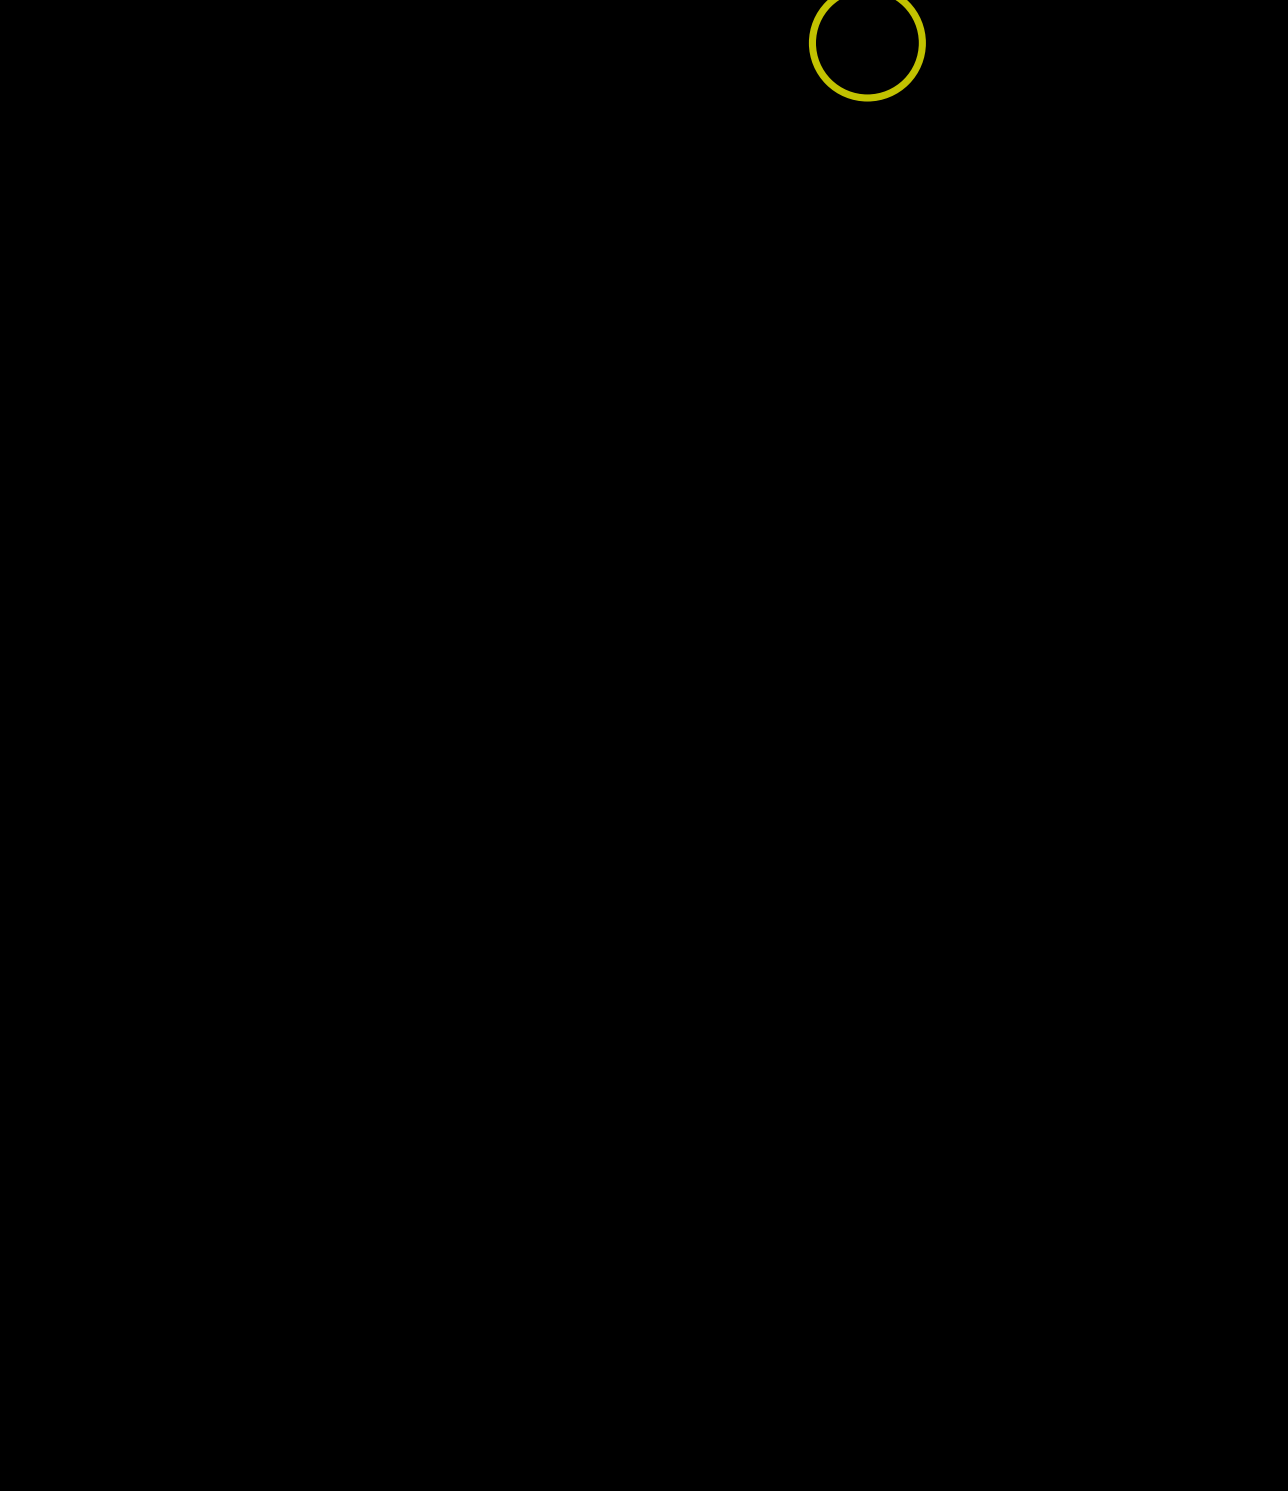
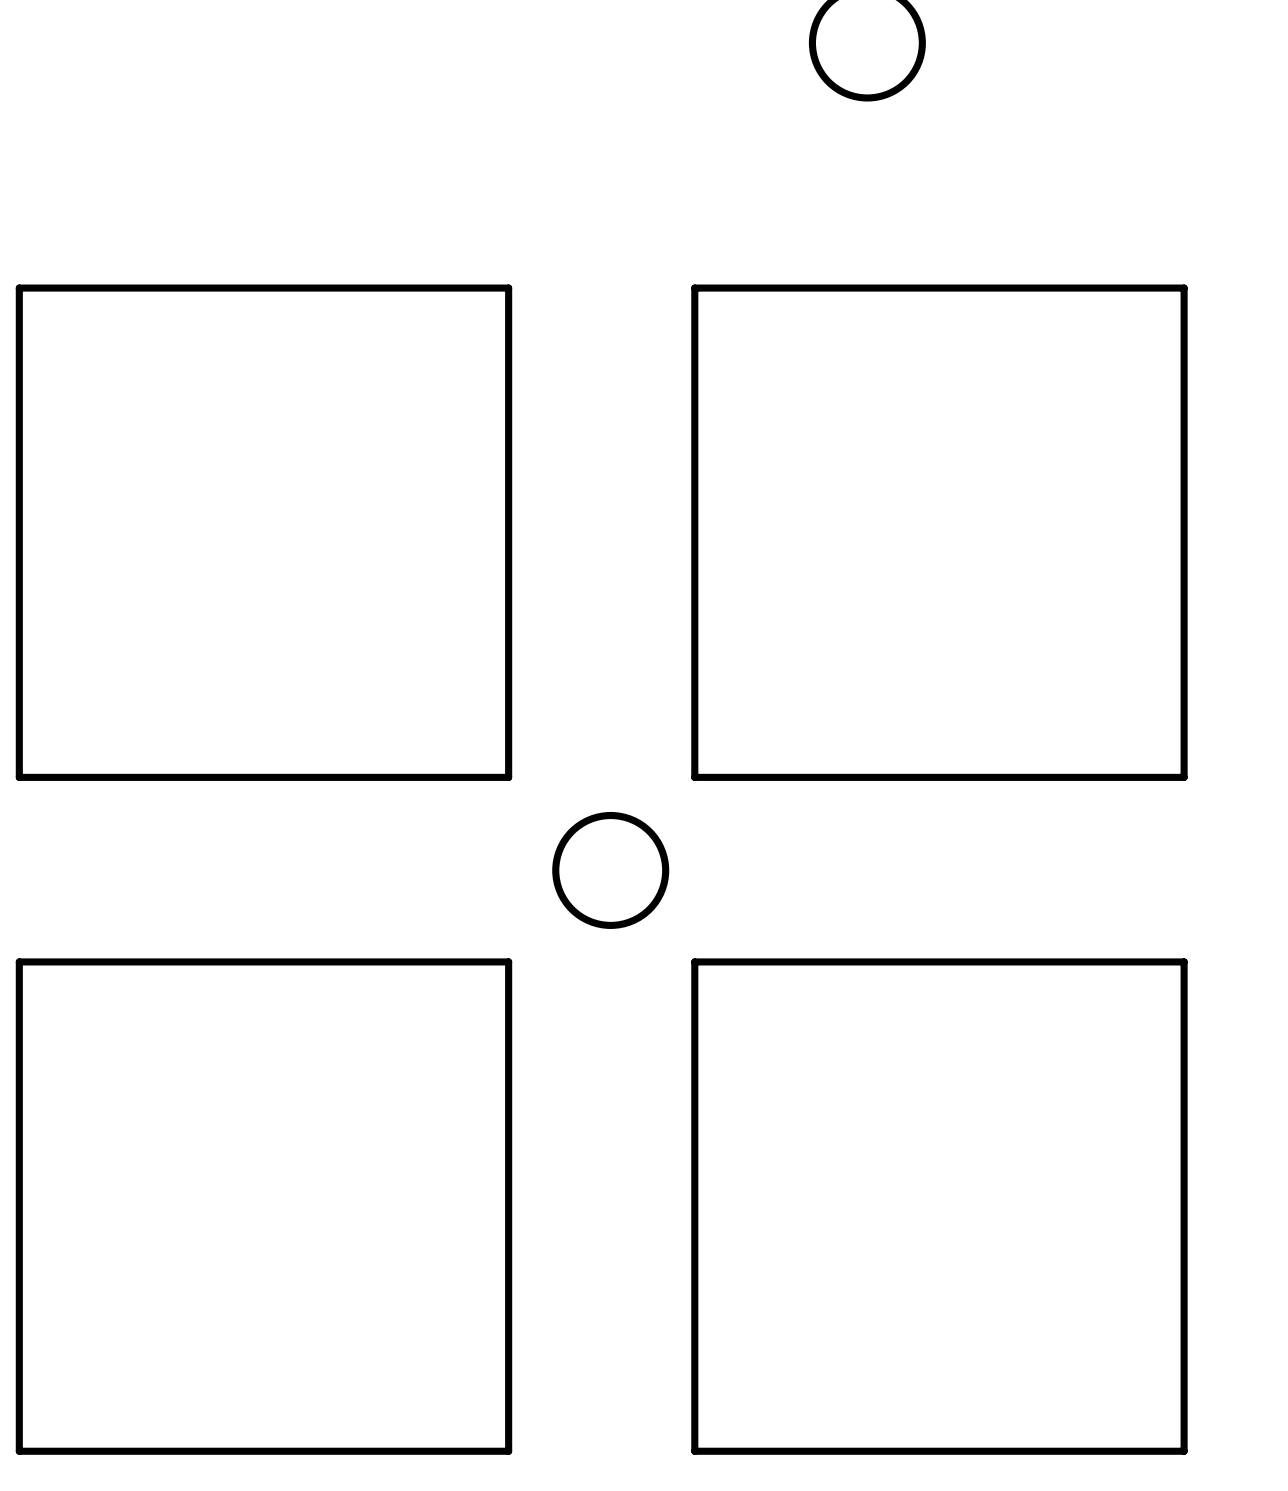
board edge: none -> (19, 288) (19, 777) (508, 777) (508, 288) (19, 288)
board edge: none -> (694, 288) (694, 777) (1184, 777) (1184, 288) (694, 288)
round board edge: none -> [552, 811, 670, 929]
board edge: none -> (19, 961) (508, 961) (508, 1451) (19, 1451) (19, 961)
board edge: none -> (694, 961) (1184, 961) (1184, 1451) (694, 1451) (694, 961)

